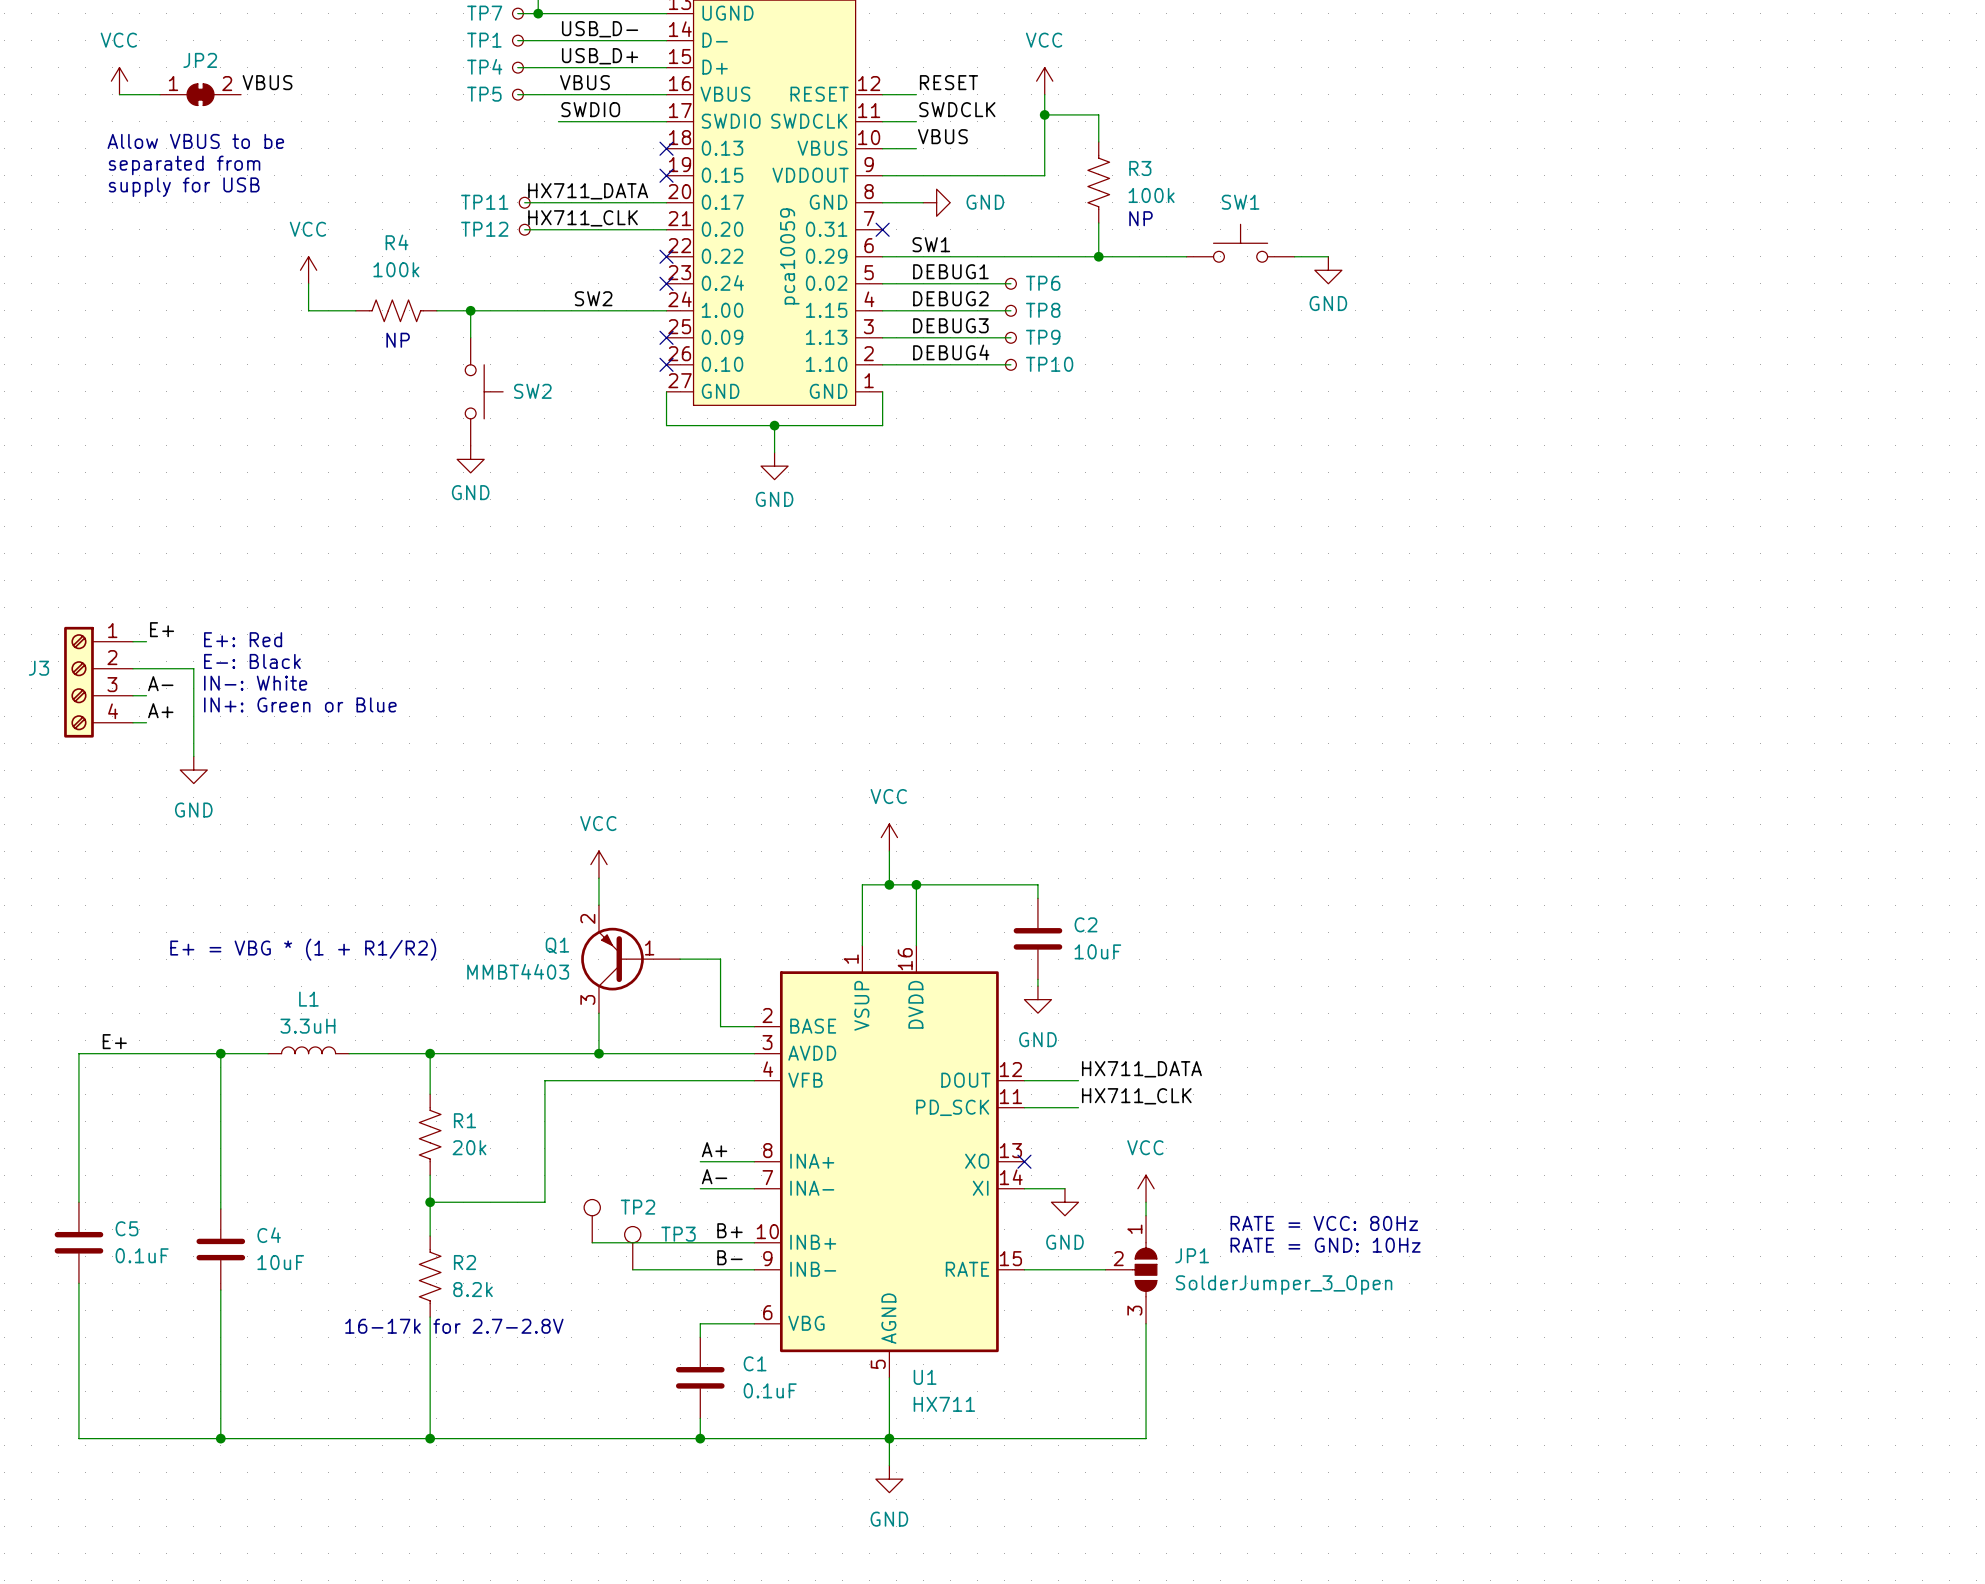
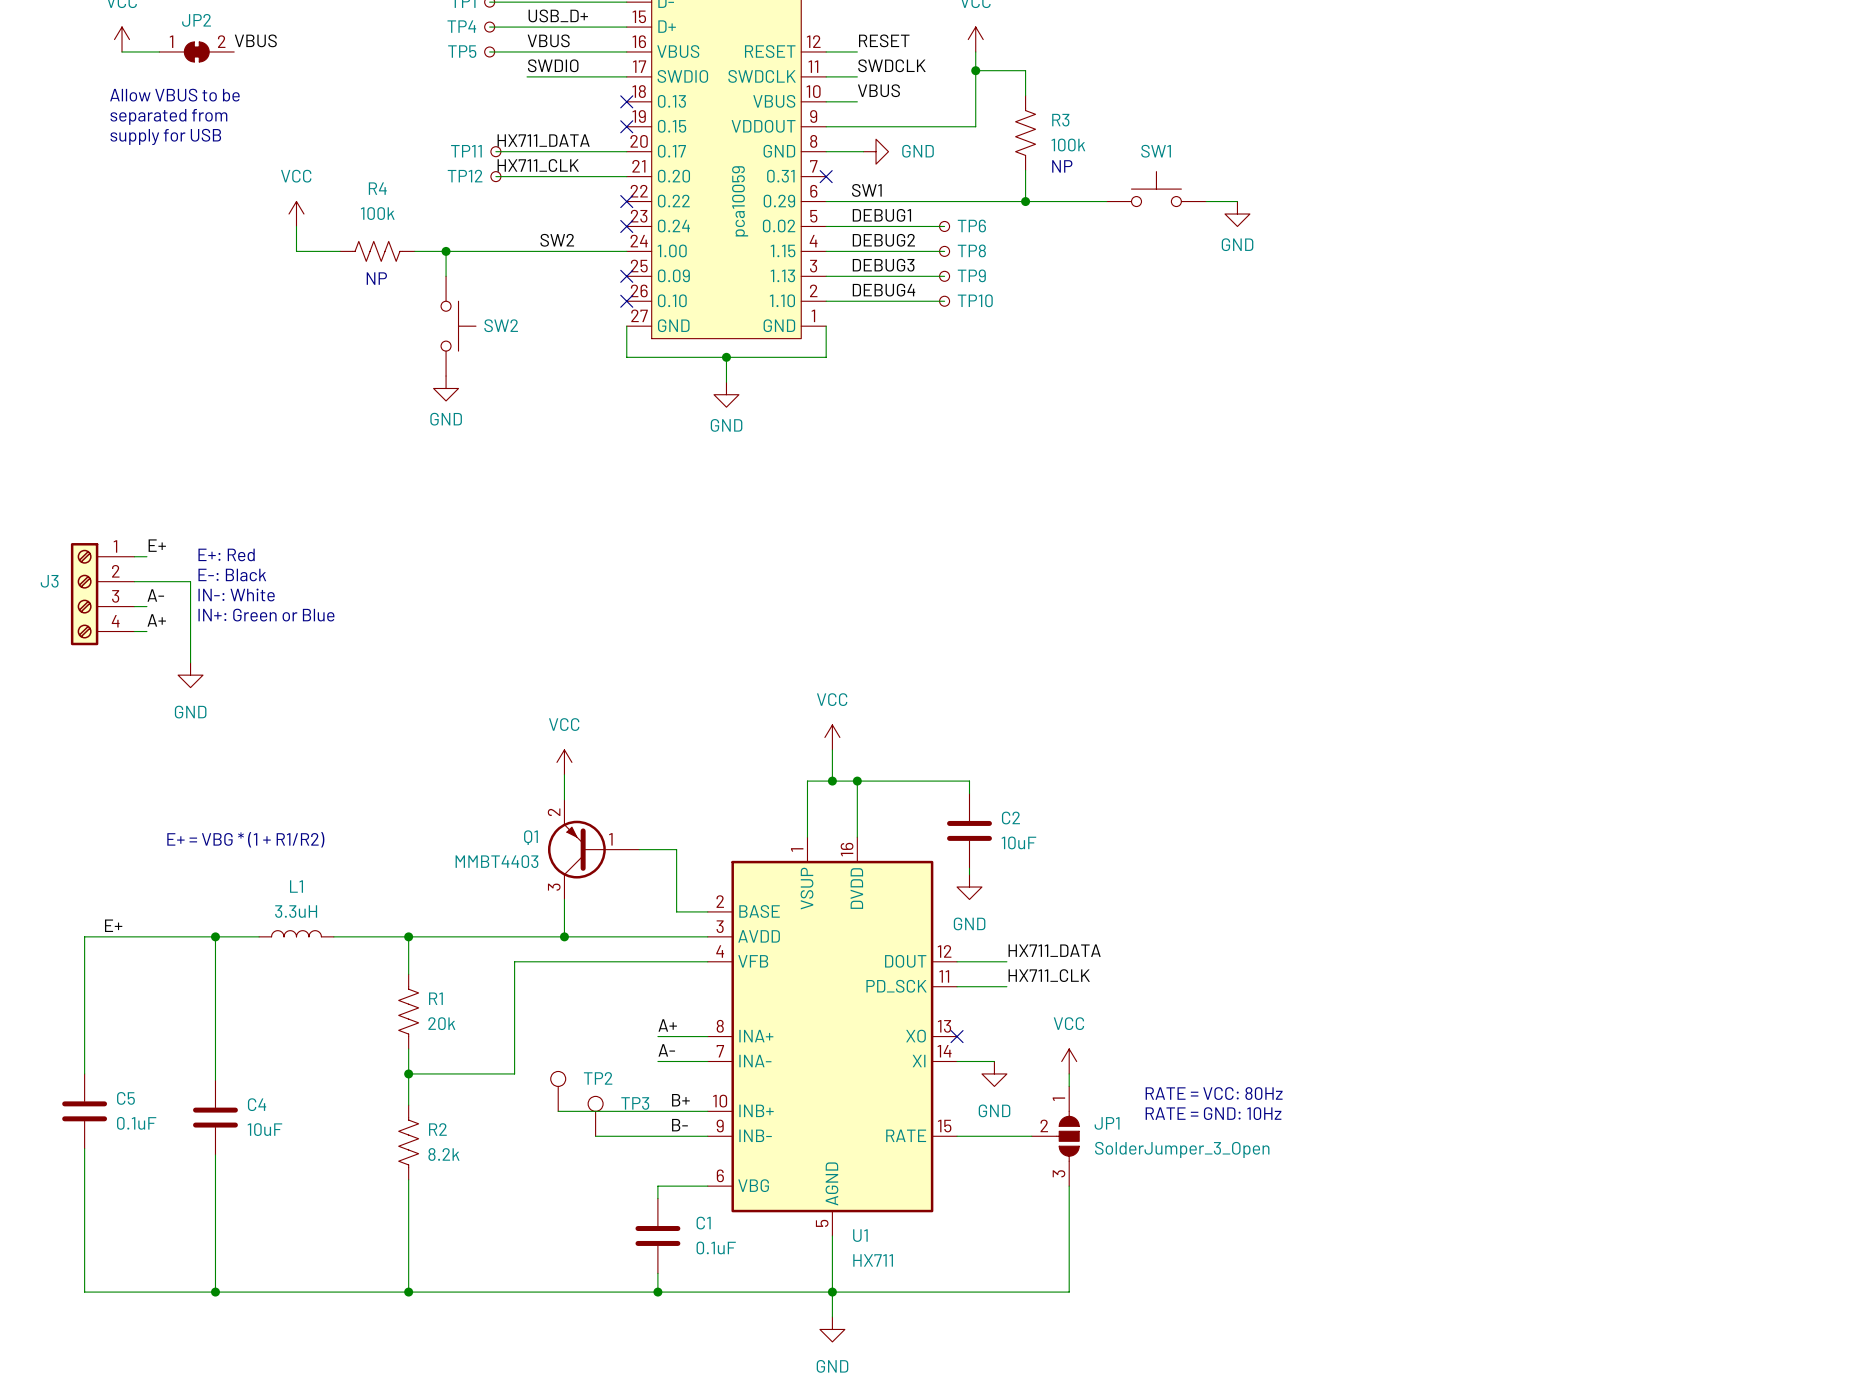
text: 16-17k for 2.7-2.8V (454, 1326) -> none

